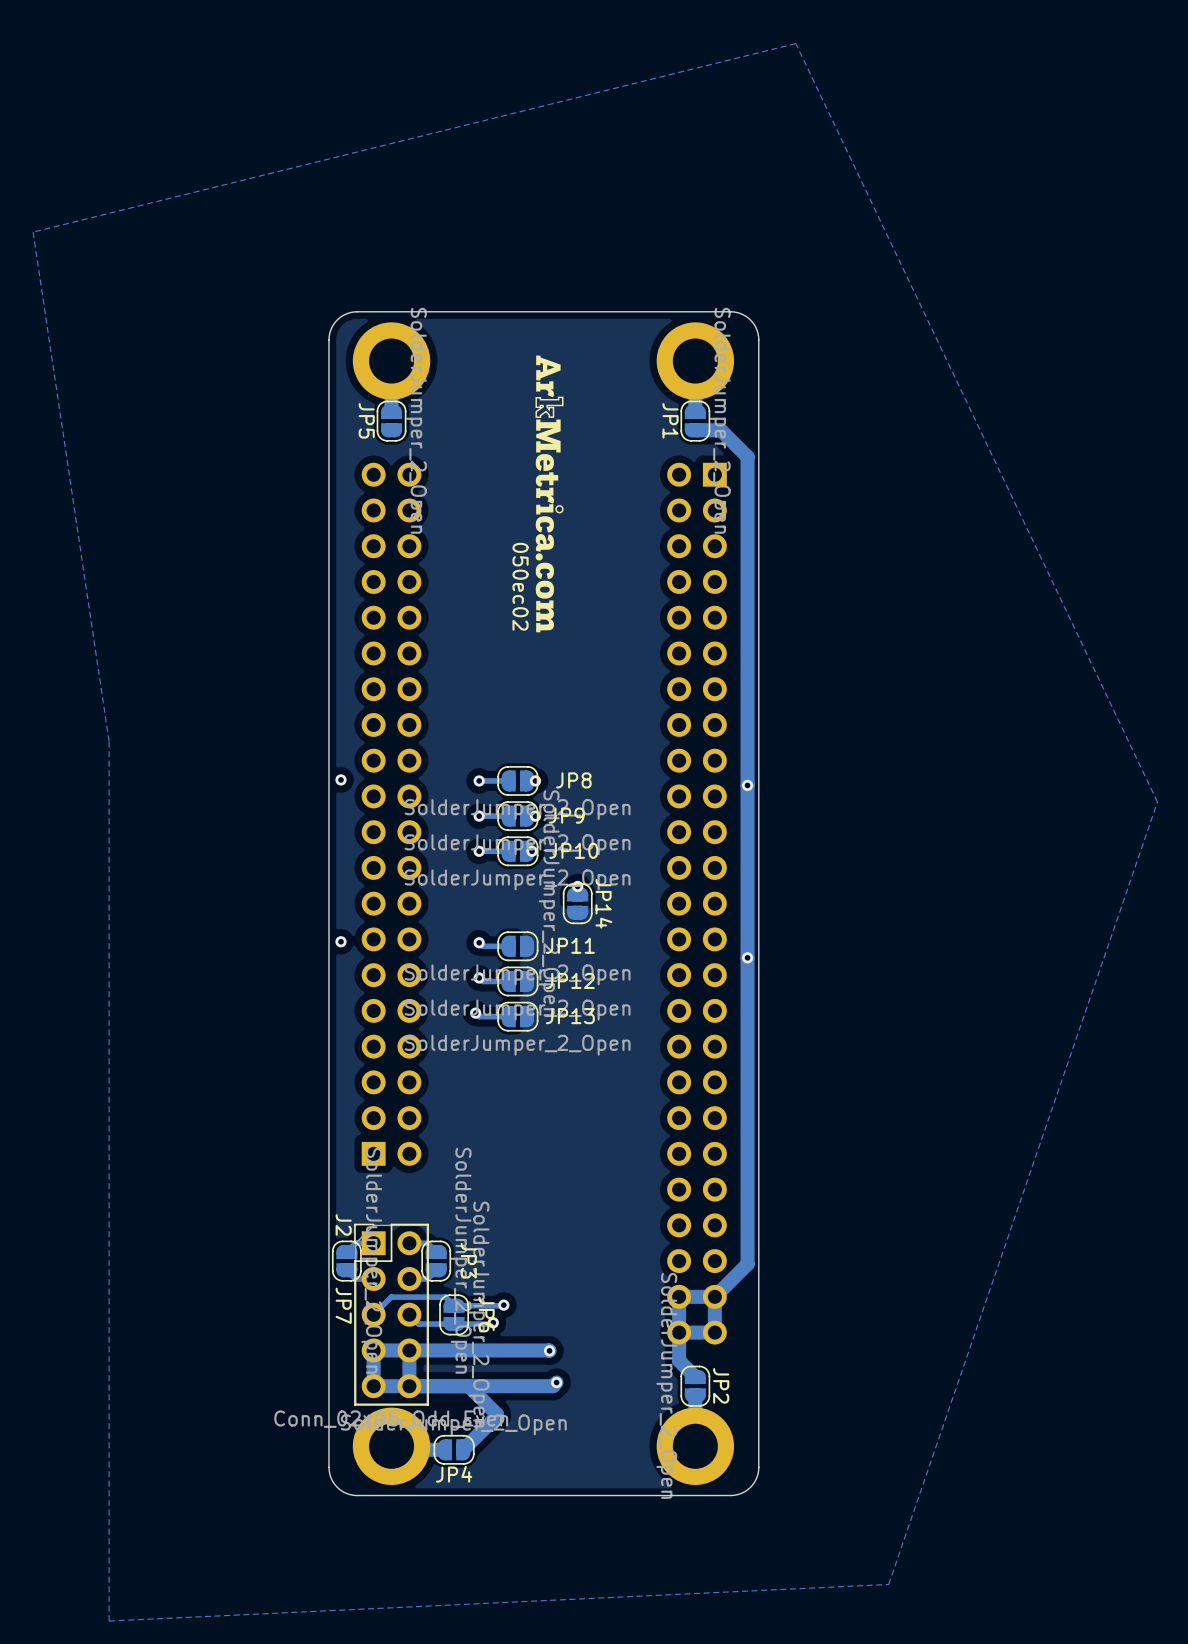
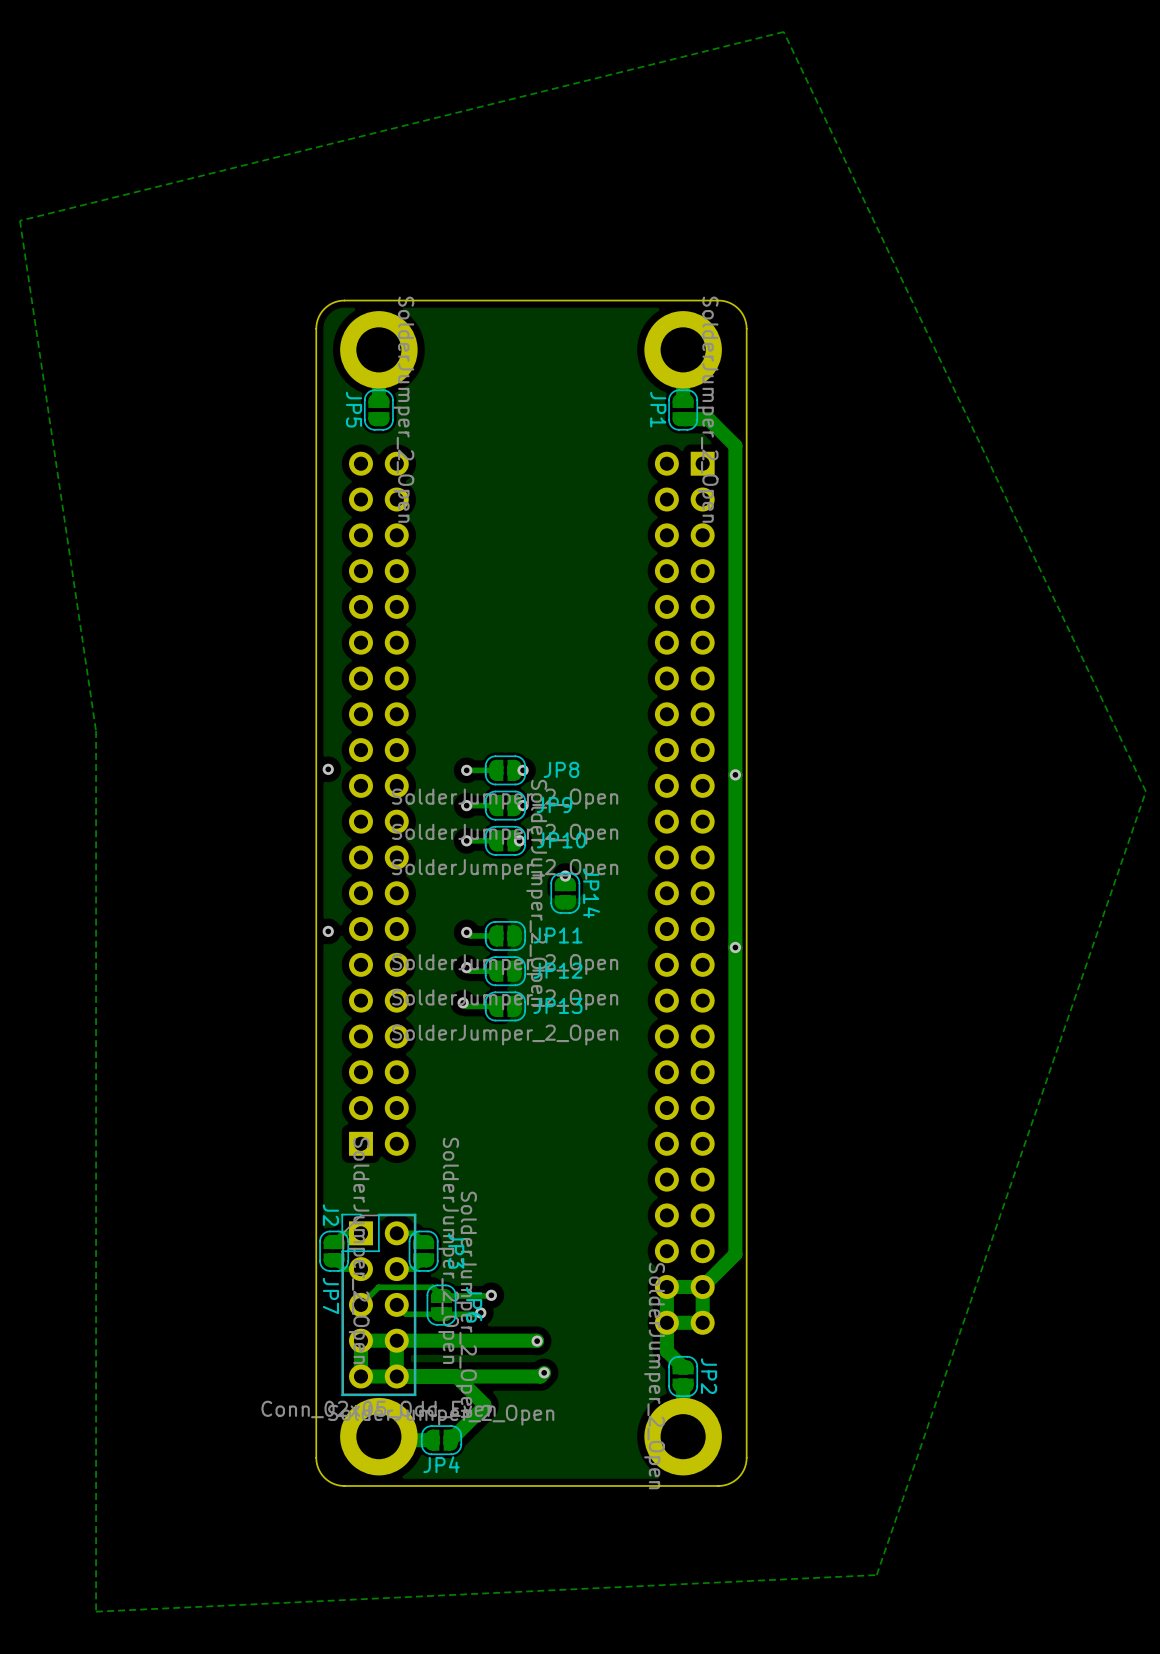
drawing: [535, 355, 564, 633] -> none
text: 050ec02 (520, 586) -> none

